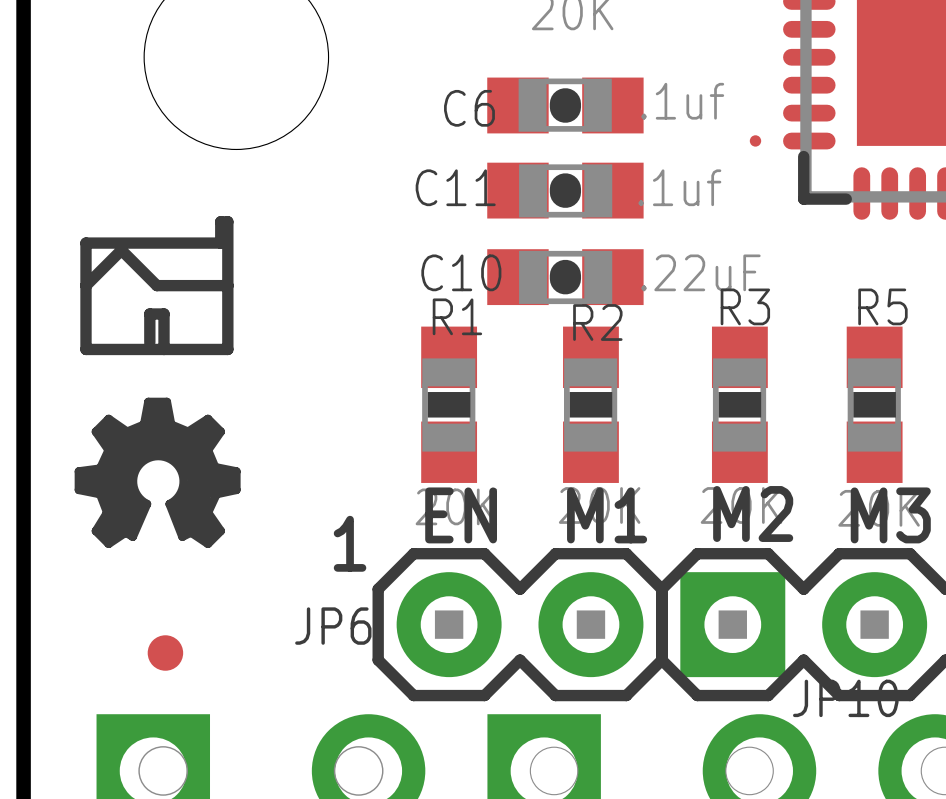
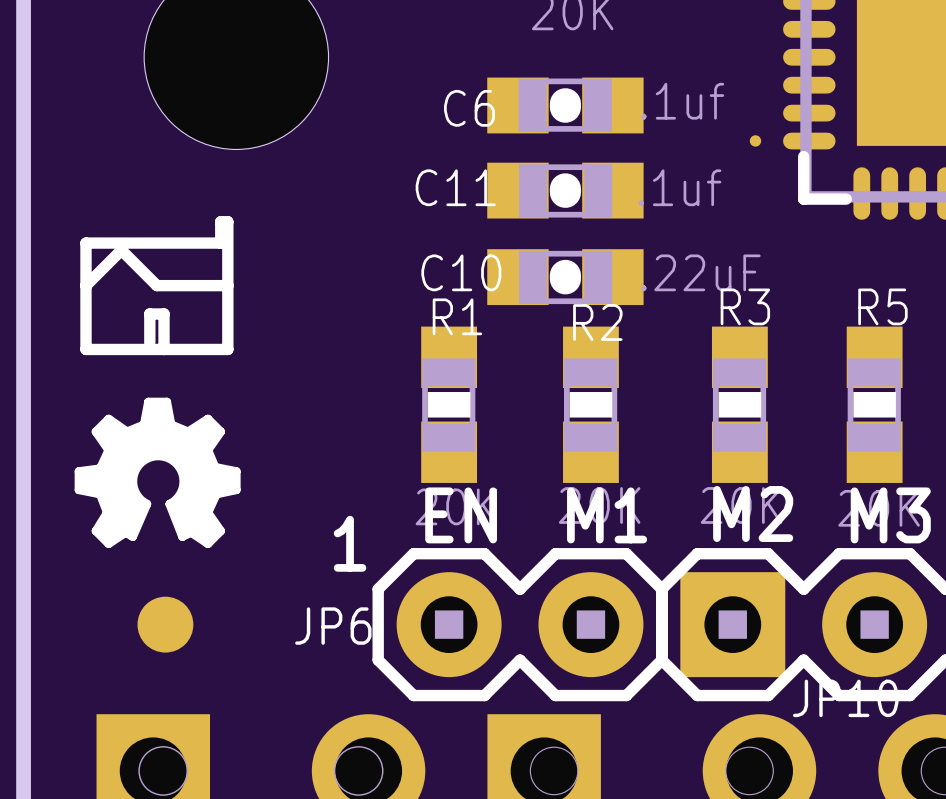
part footprint: [147, 635, 184, 671] -> [137, 596, 194, 653]

